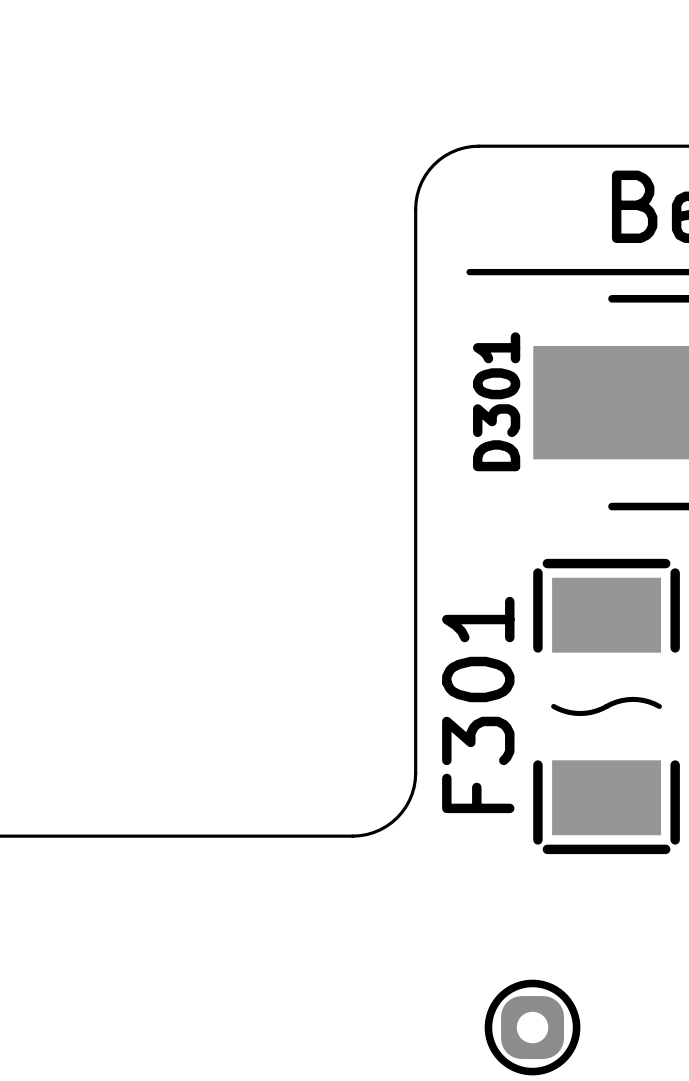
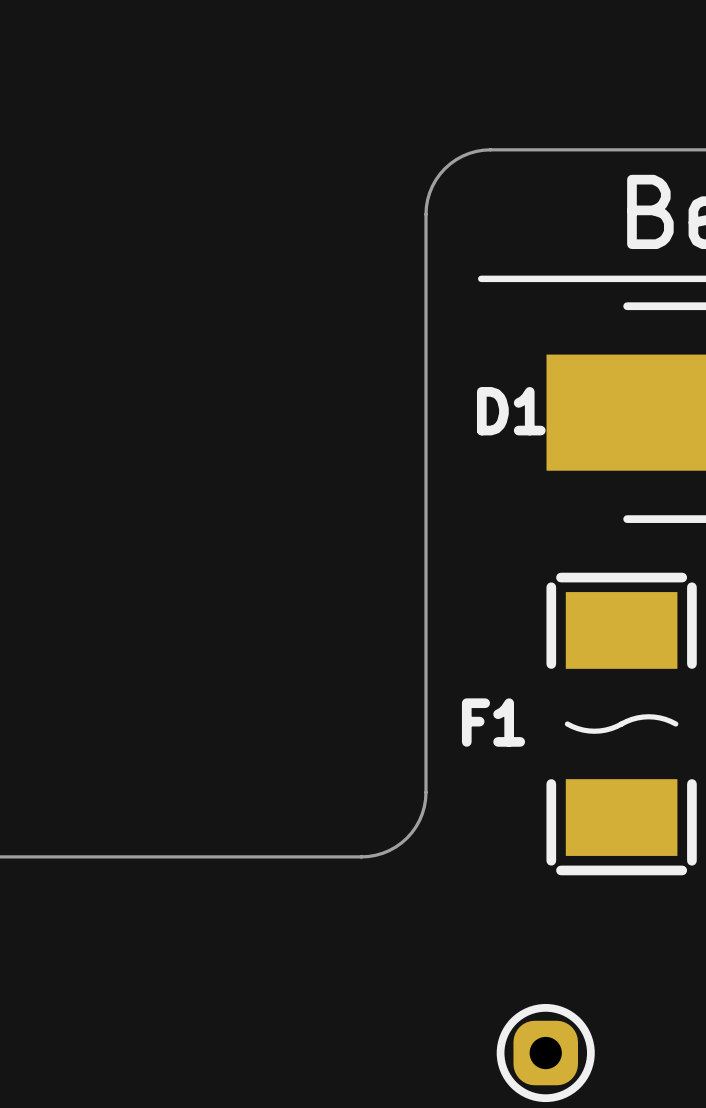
D301 name: D301 (496, 401) -> D1 (511, 411)
F301 name: F301 (478, 704) -> F1 (493, 722)

